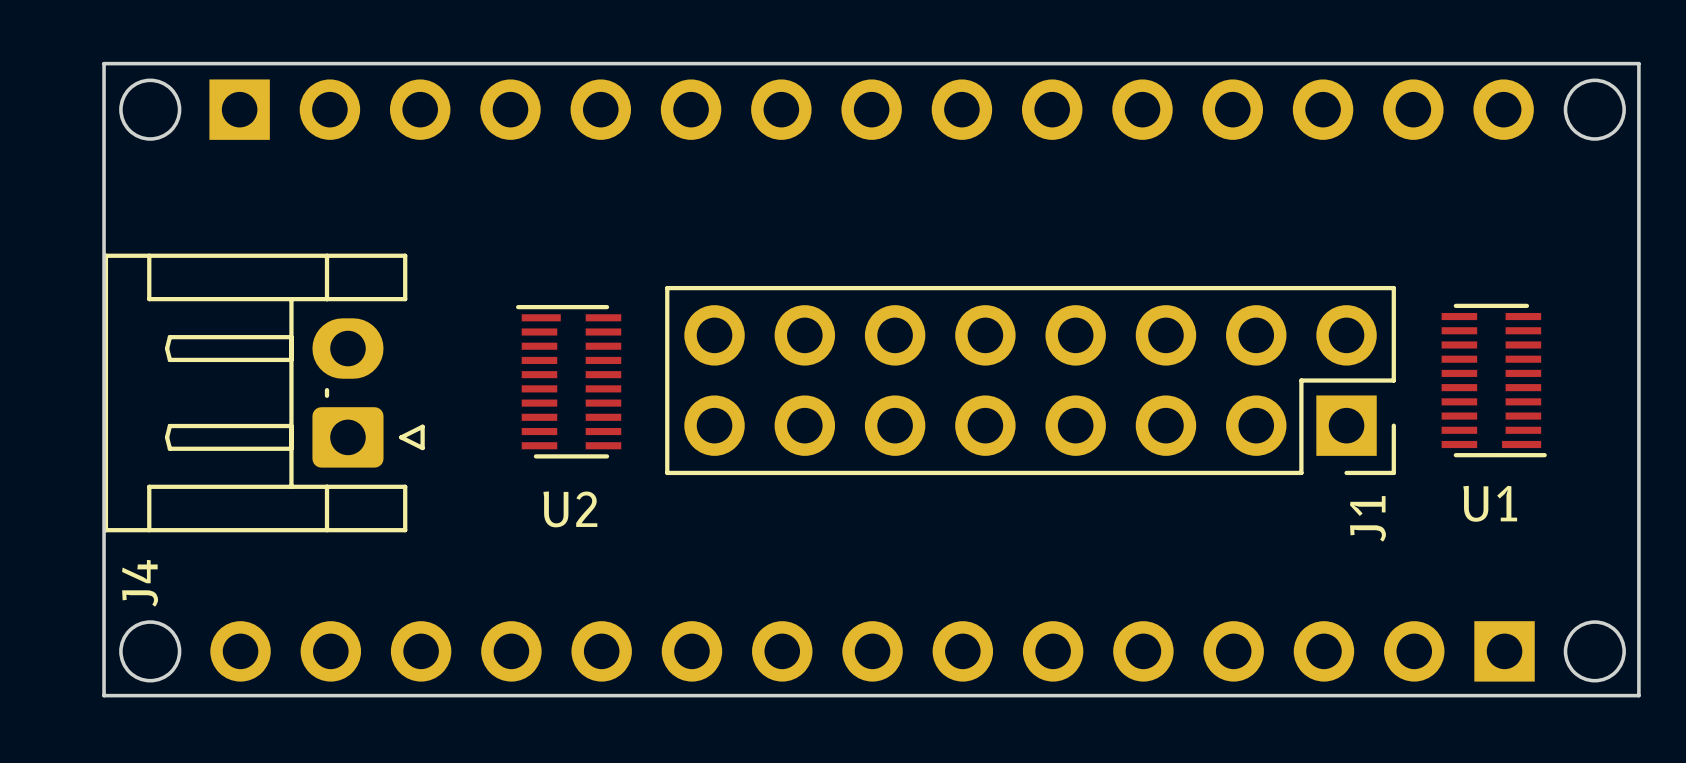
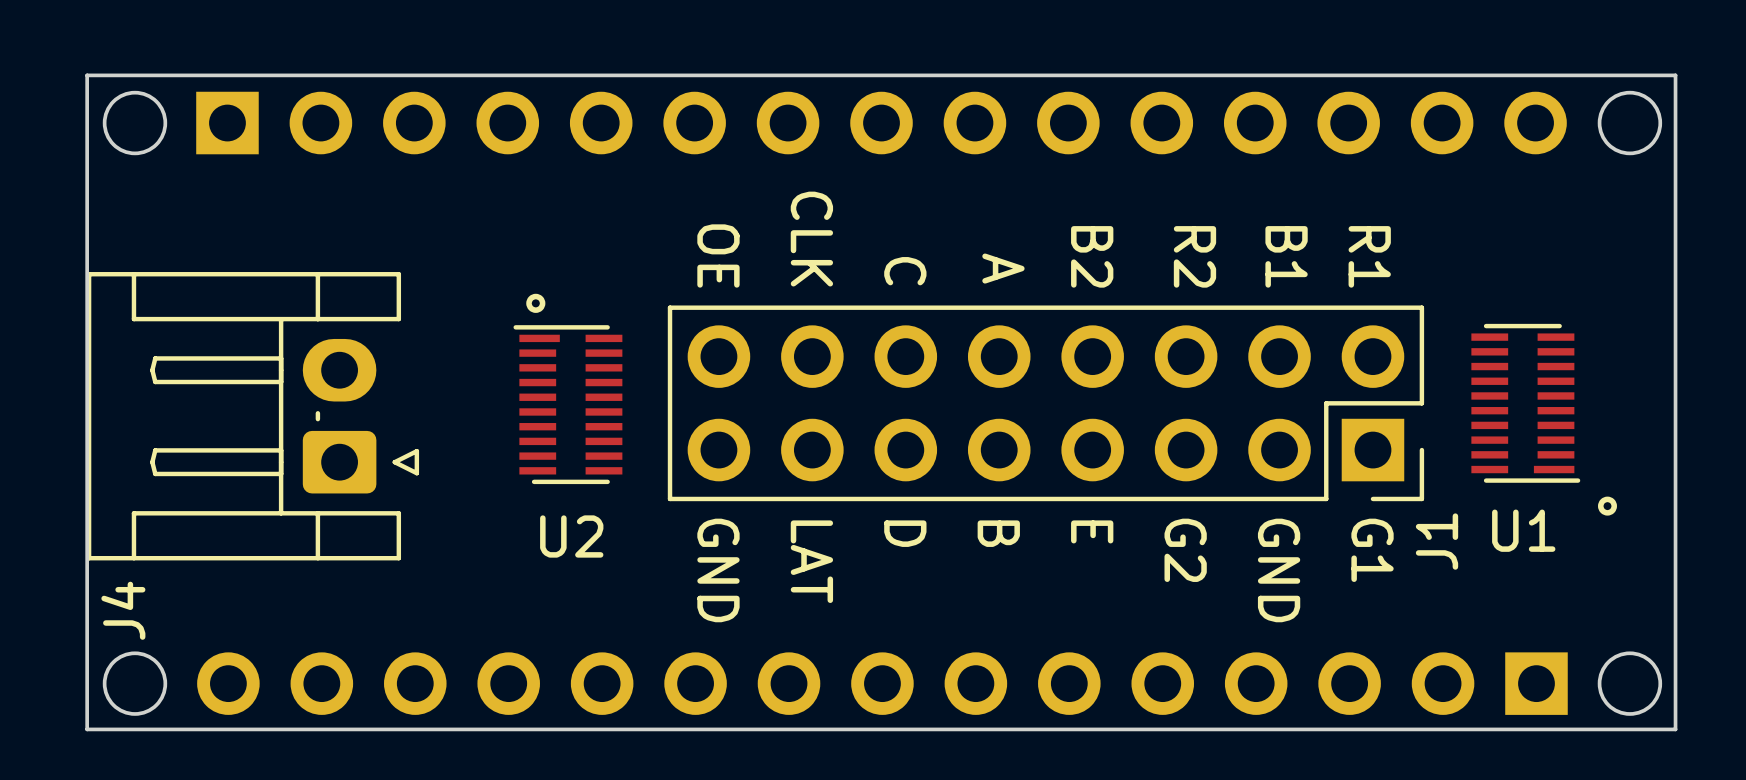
text: none -> CLK (811, 239)
text: none -> B2 (1092, 256)
text: none -> R2 (1194, 256)
text: none -> B1 (1286, 256)
text: none -> R1 (1369, 256)
text: none -> OE (718, 256)
text: none -> C (905, 271)
text: none -> A (1003, 268)
drawing: none -> [526, 293, 546, 313]
drawing: none -> [1598, 496, 1617, 516]
text: none -> E (1092, 531)
text: none -> B (998, 533)
text: none -> D (905, 533)
text: none -> G2 (1185, 550)
text: none -> G1 (1372, 550)
J1 name position: J1 (1367, 518) -> J1 (1437, 541)
text: none -> LAT (811, 561)
text: none -> GND (718, 570)
text: none -> GND (1279, 570)

